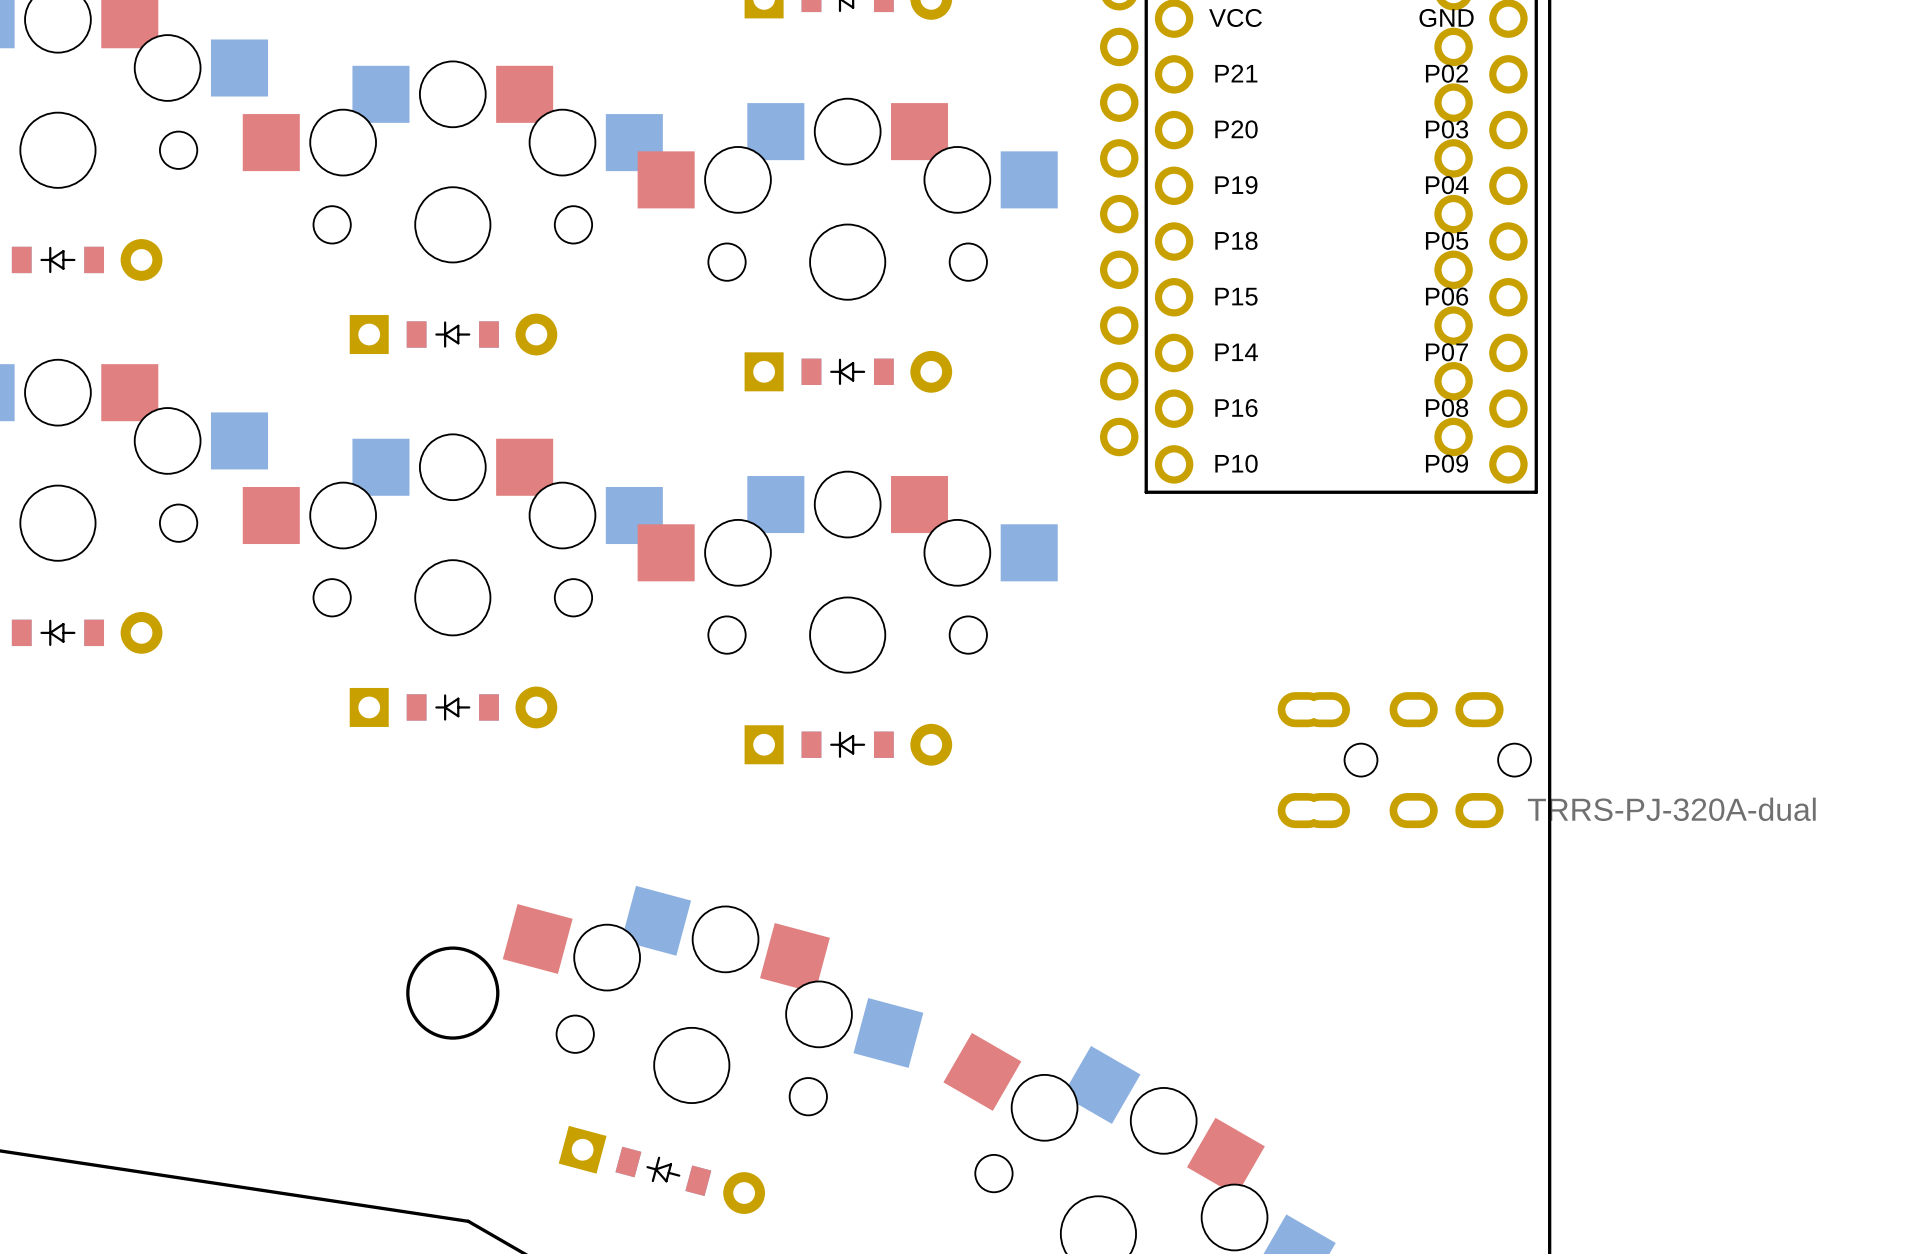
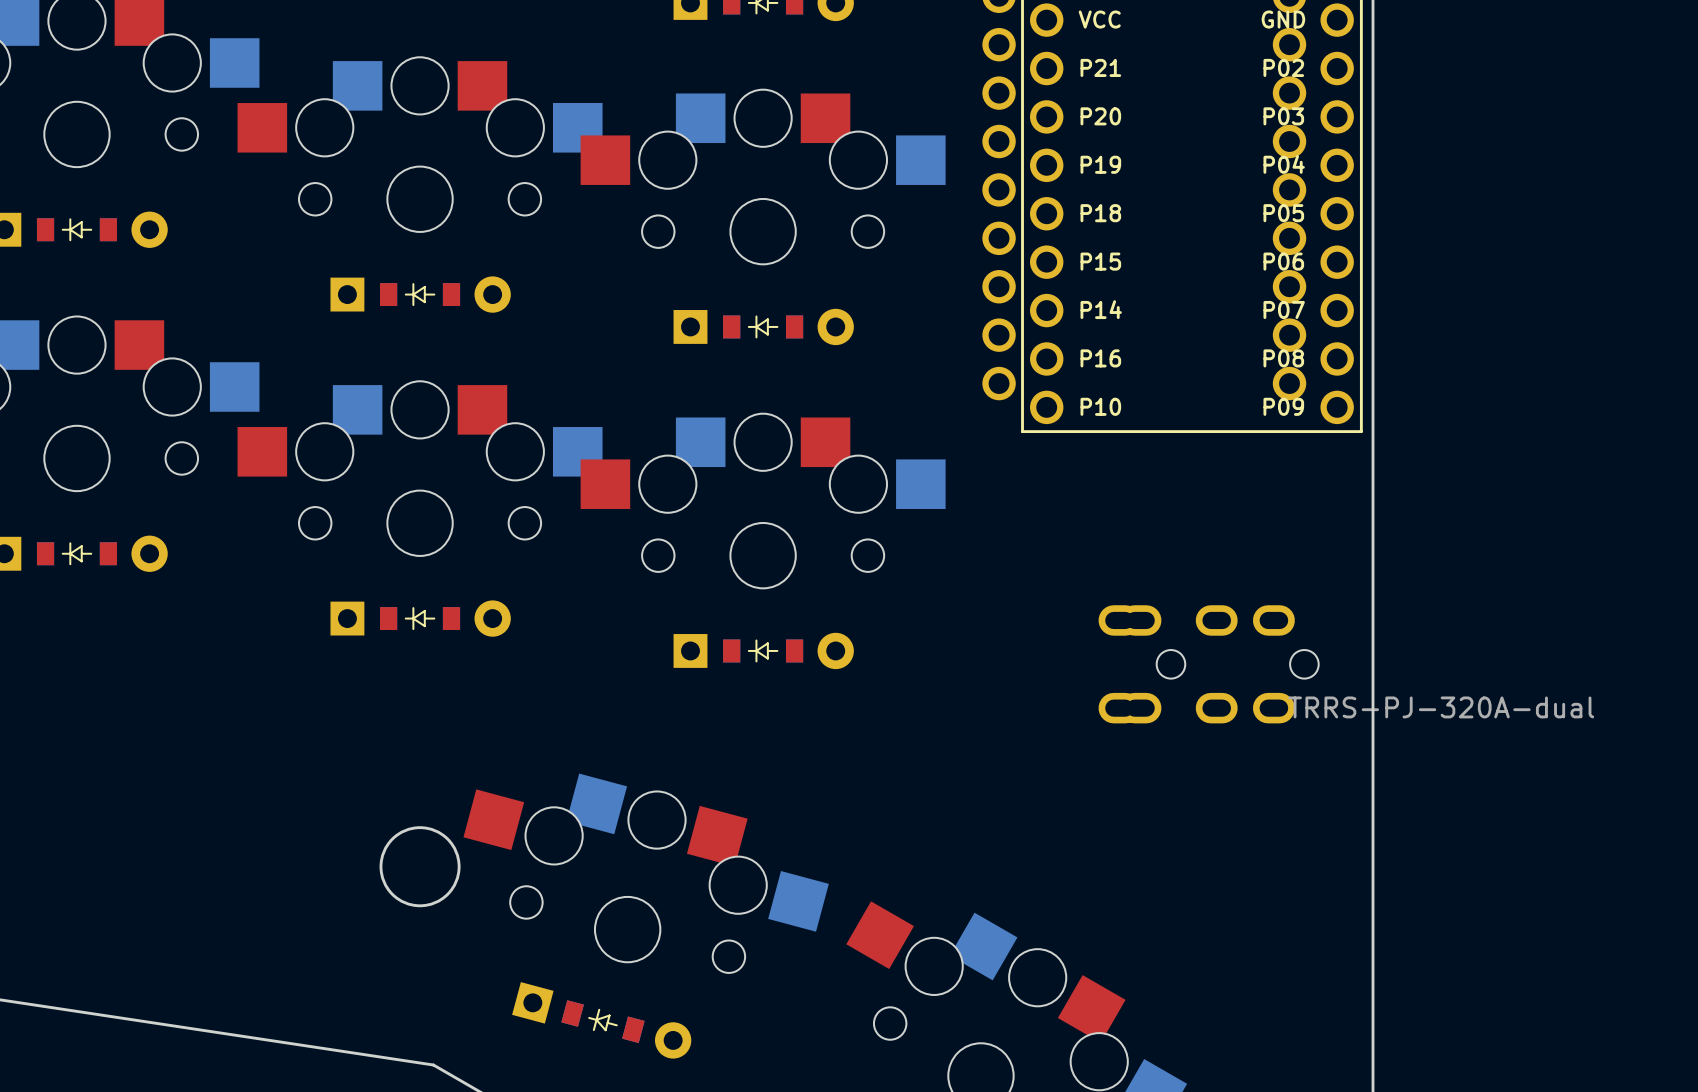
part position: (1404, 760) -> (1208, 664)

